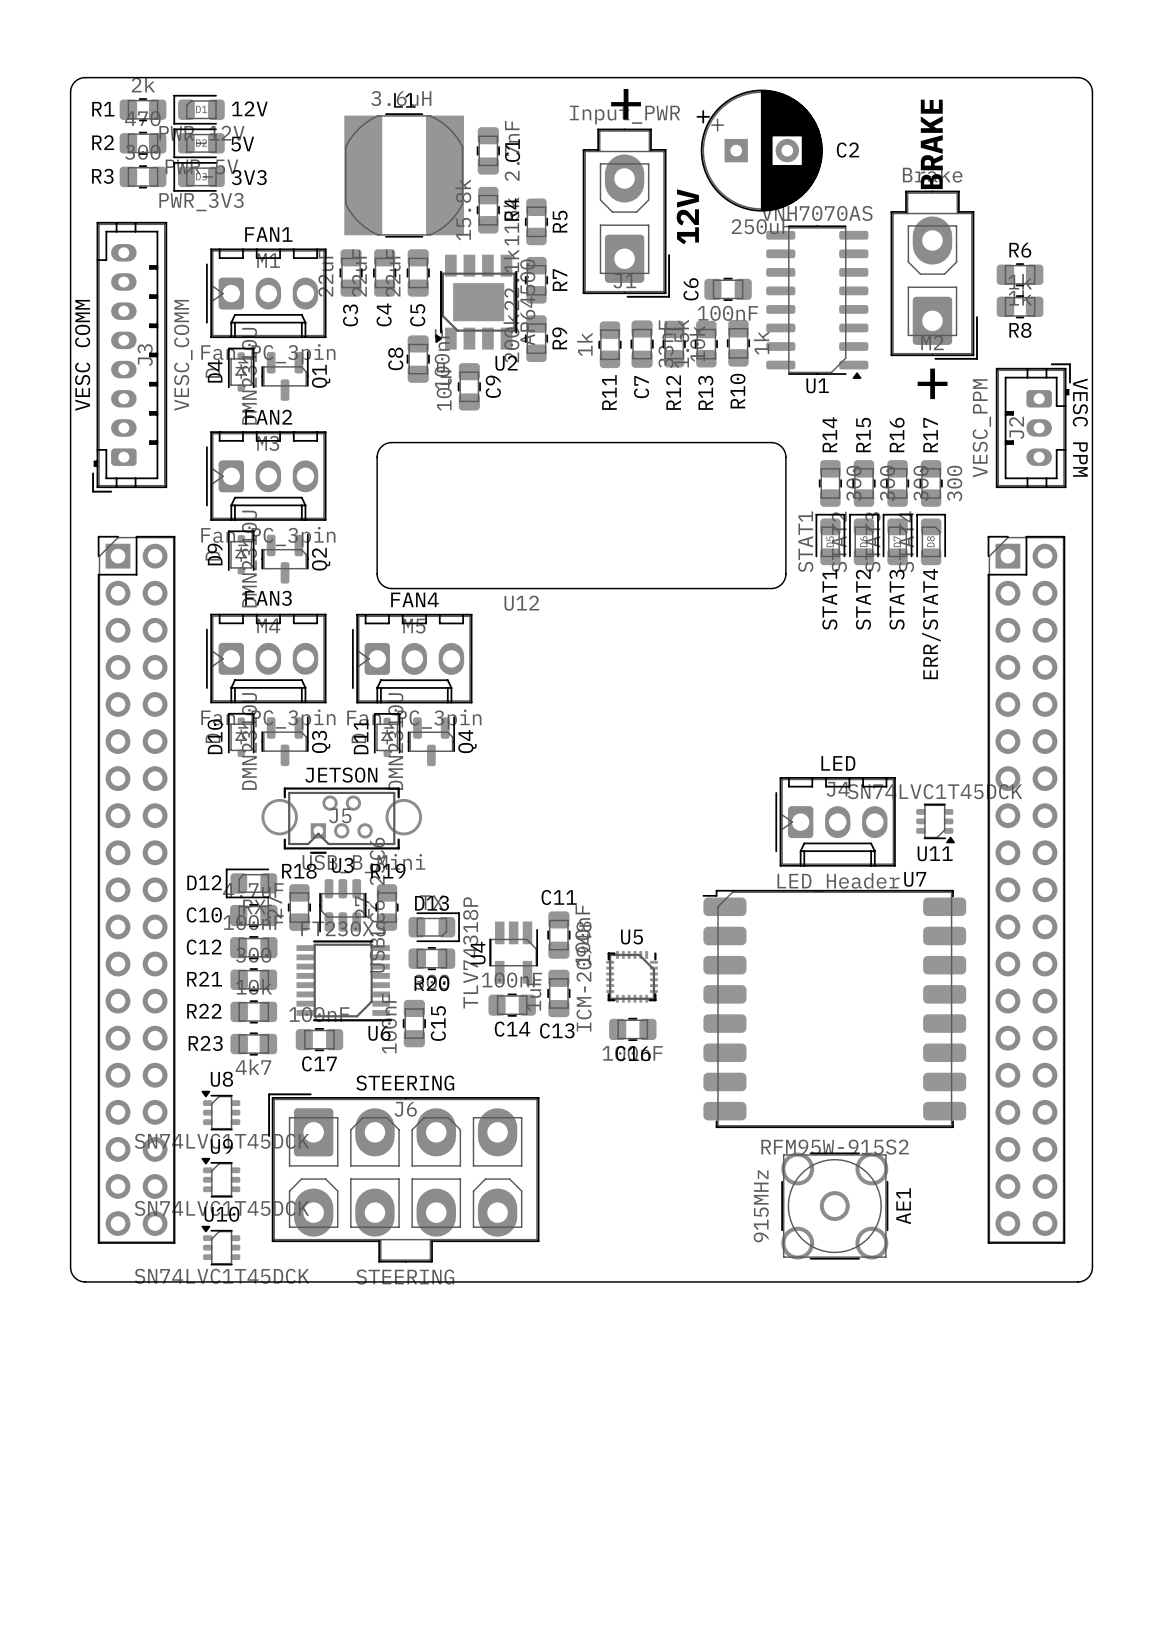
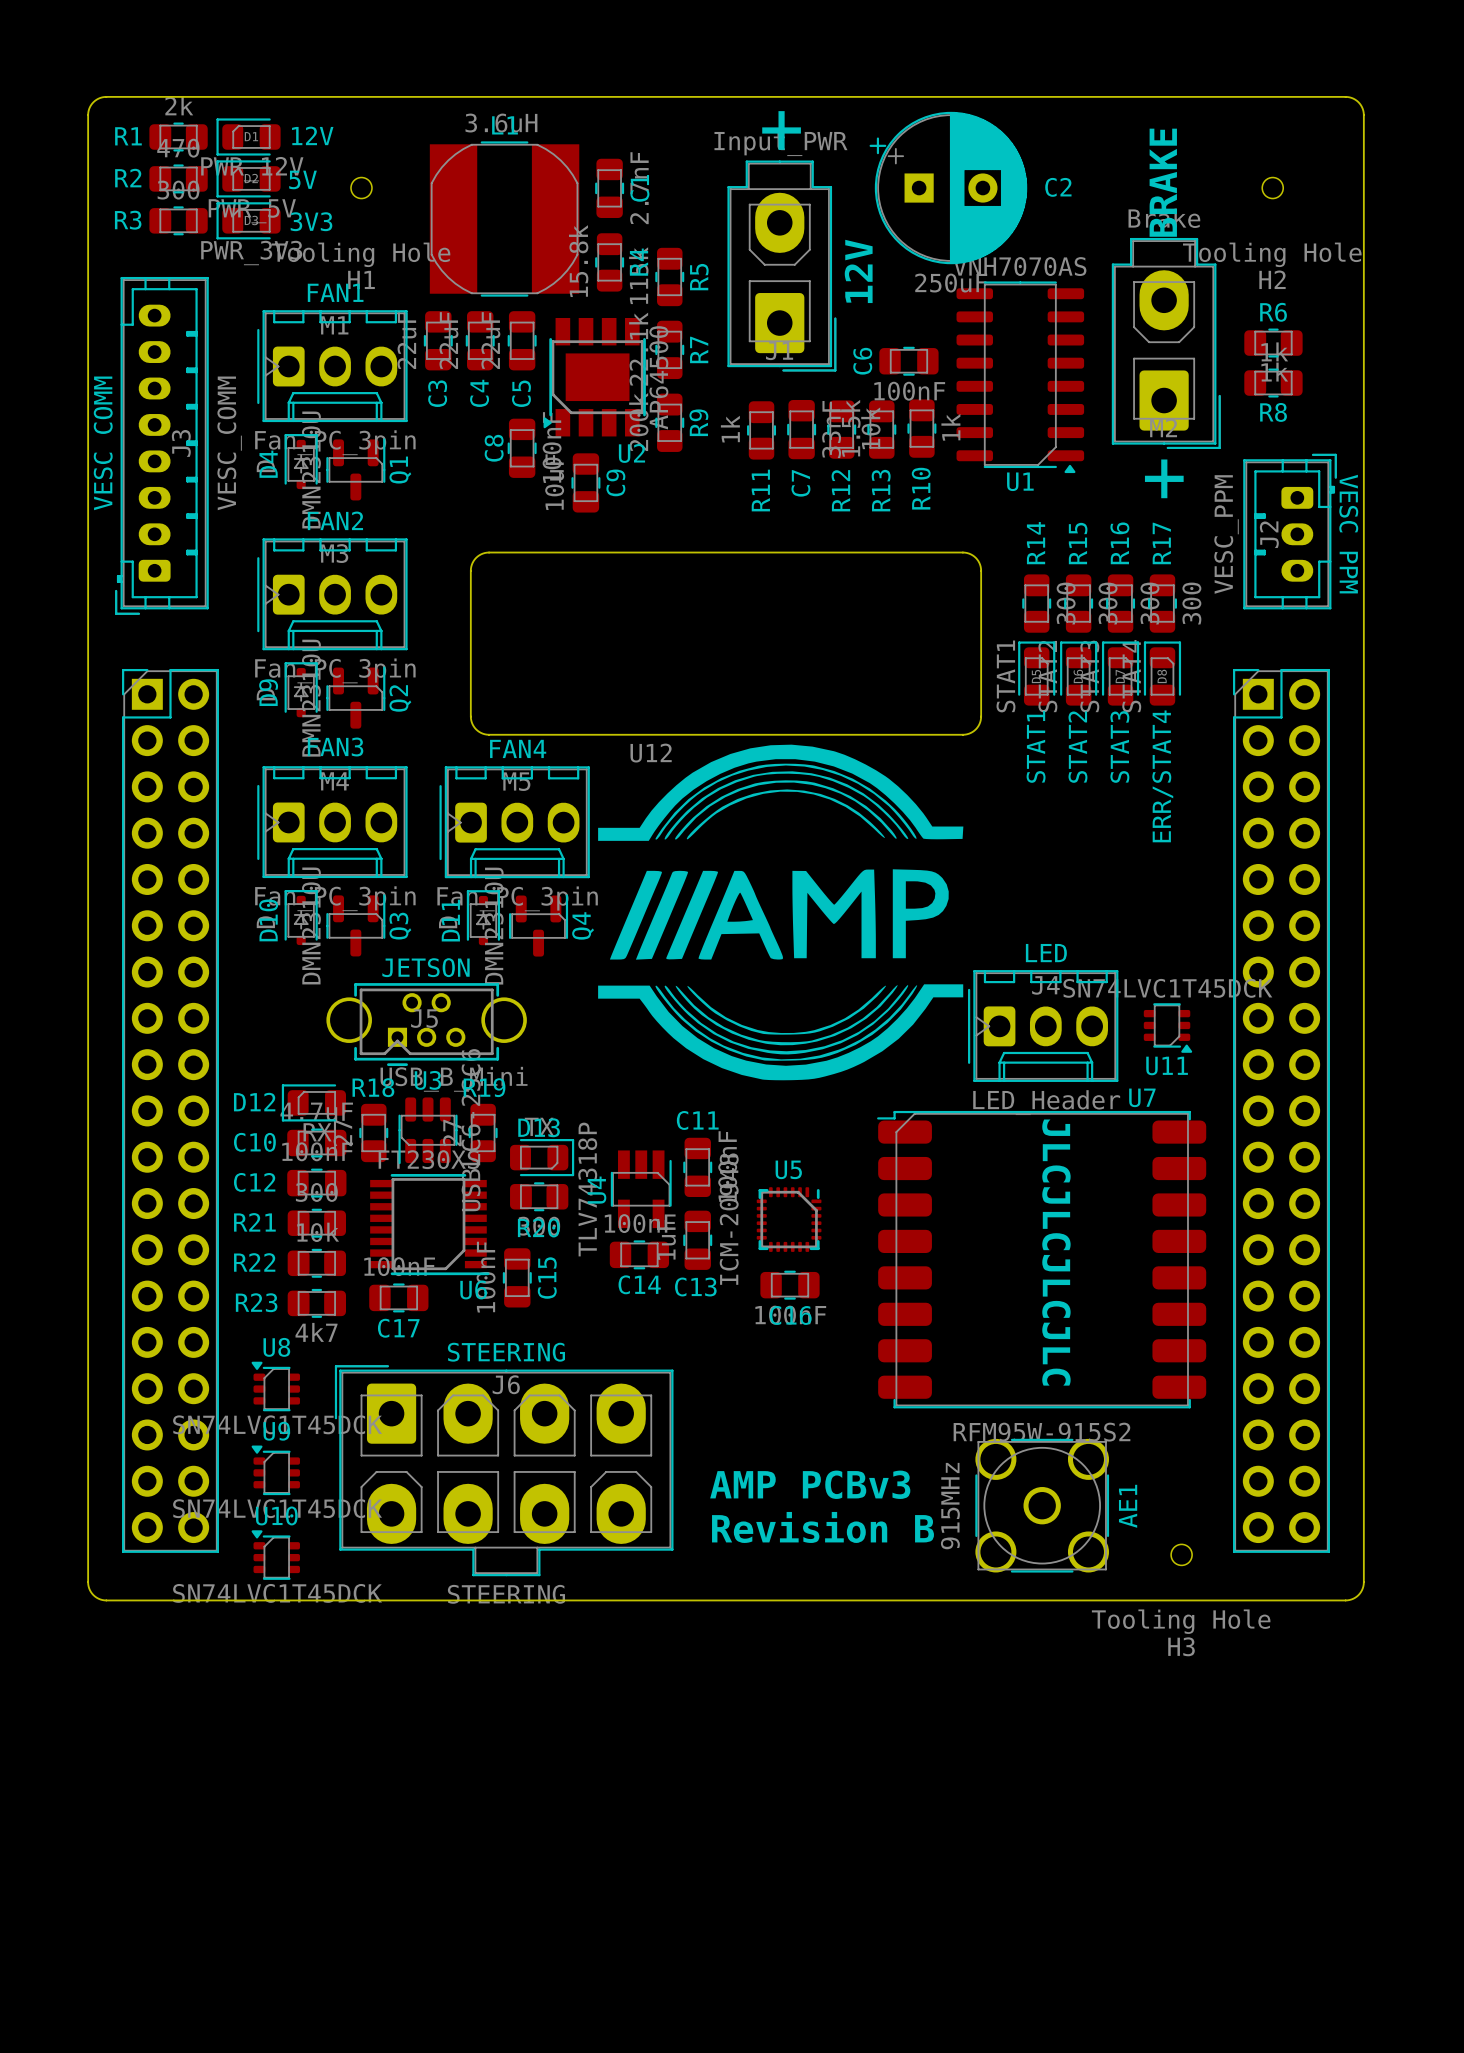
H1: none -> Tooling Hole (361, 188)
H2: none -> Tooling Hole (1272, 188)
drawing: none -> [598, 744, 964, 1081]
text: none -> JLCJLCJLCJLC (1056, 1252)
text: none -> AMP PCBv3 (810, 1484)
text: none -> Revision B (823, 1527)
H3: none -> Tooling Hole (1181, 1554)

